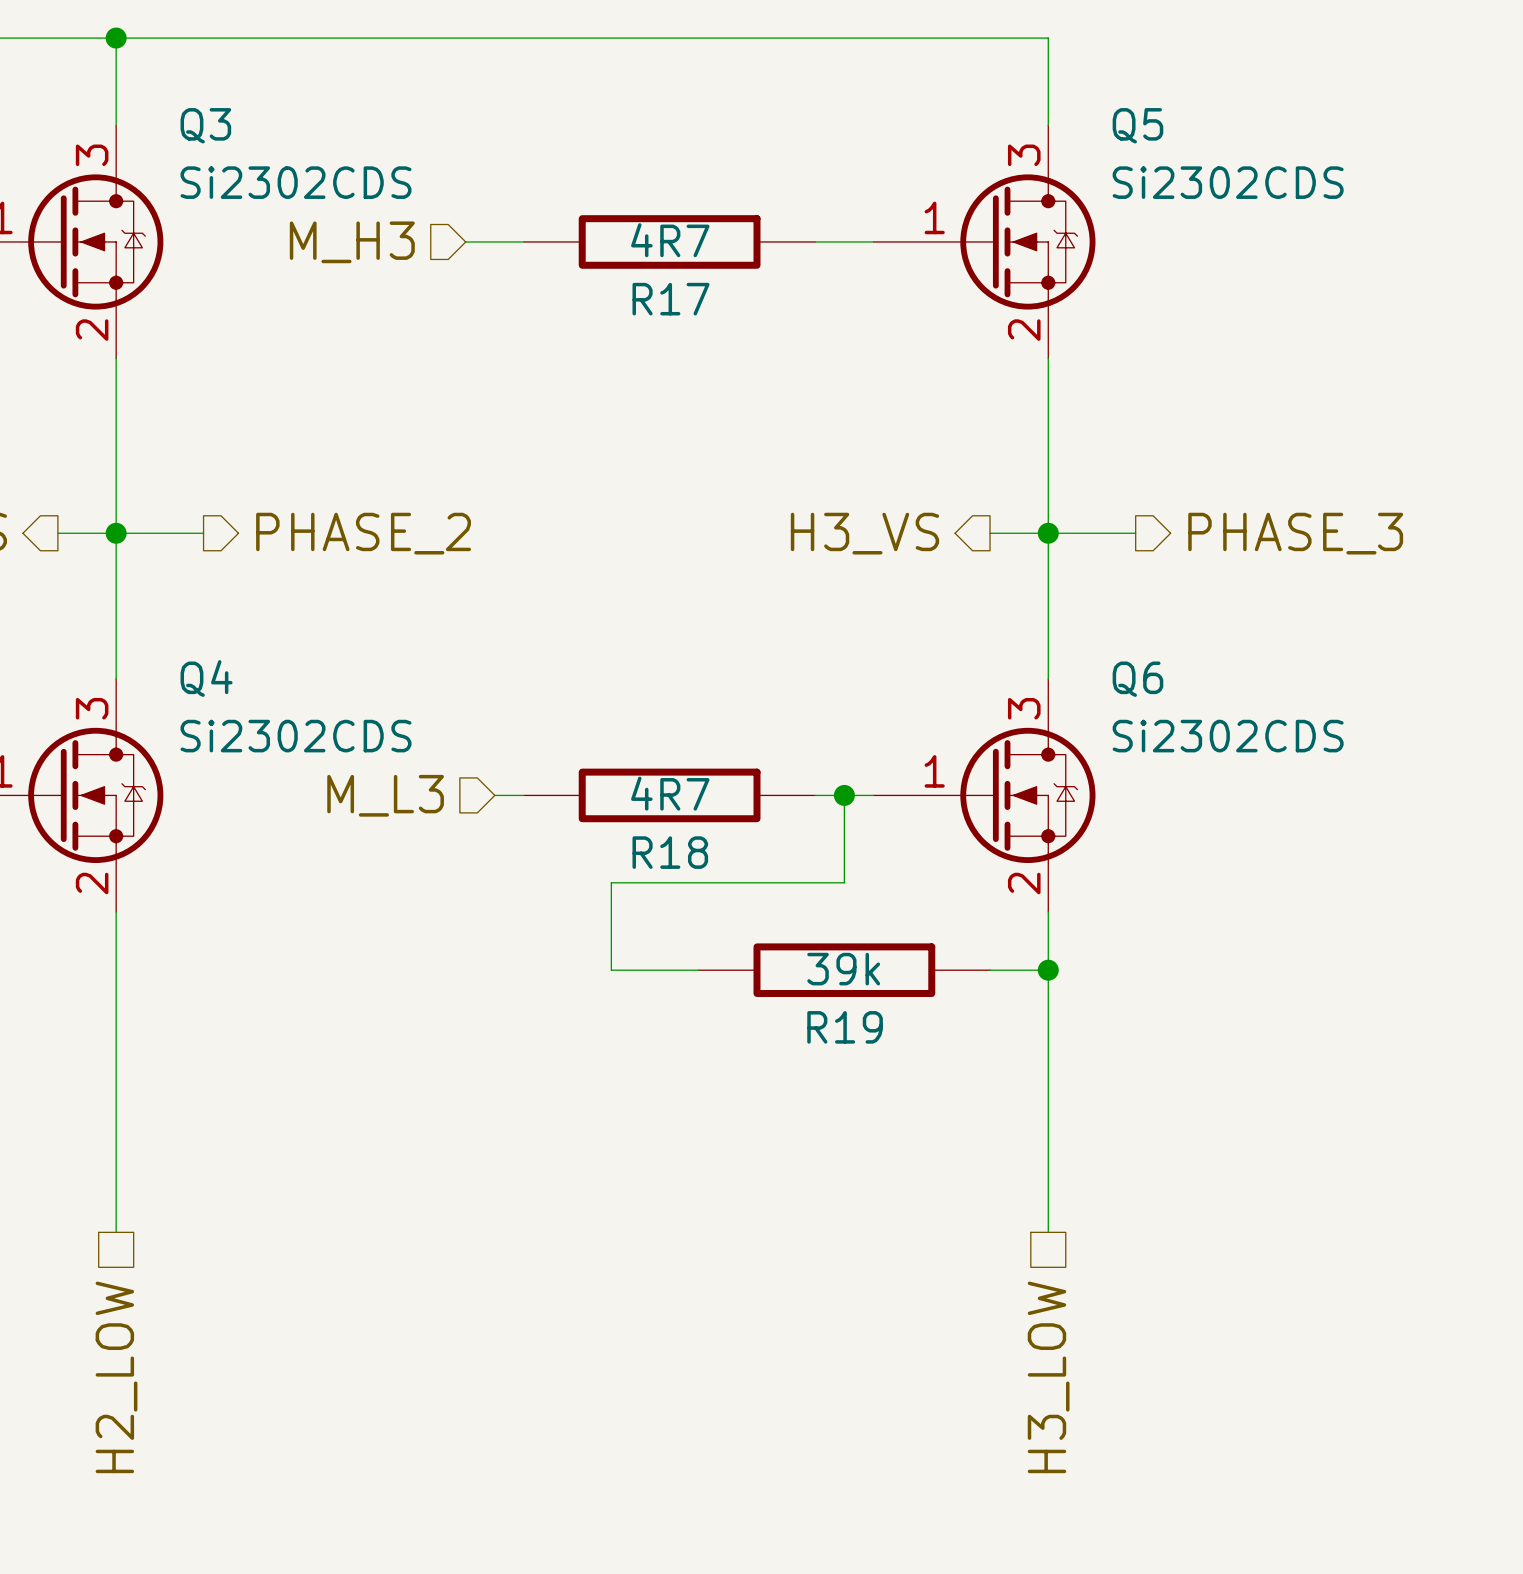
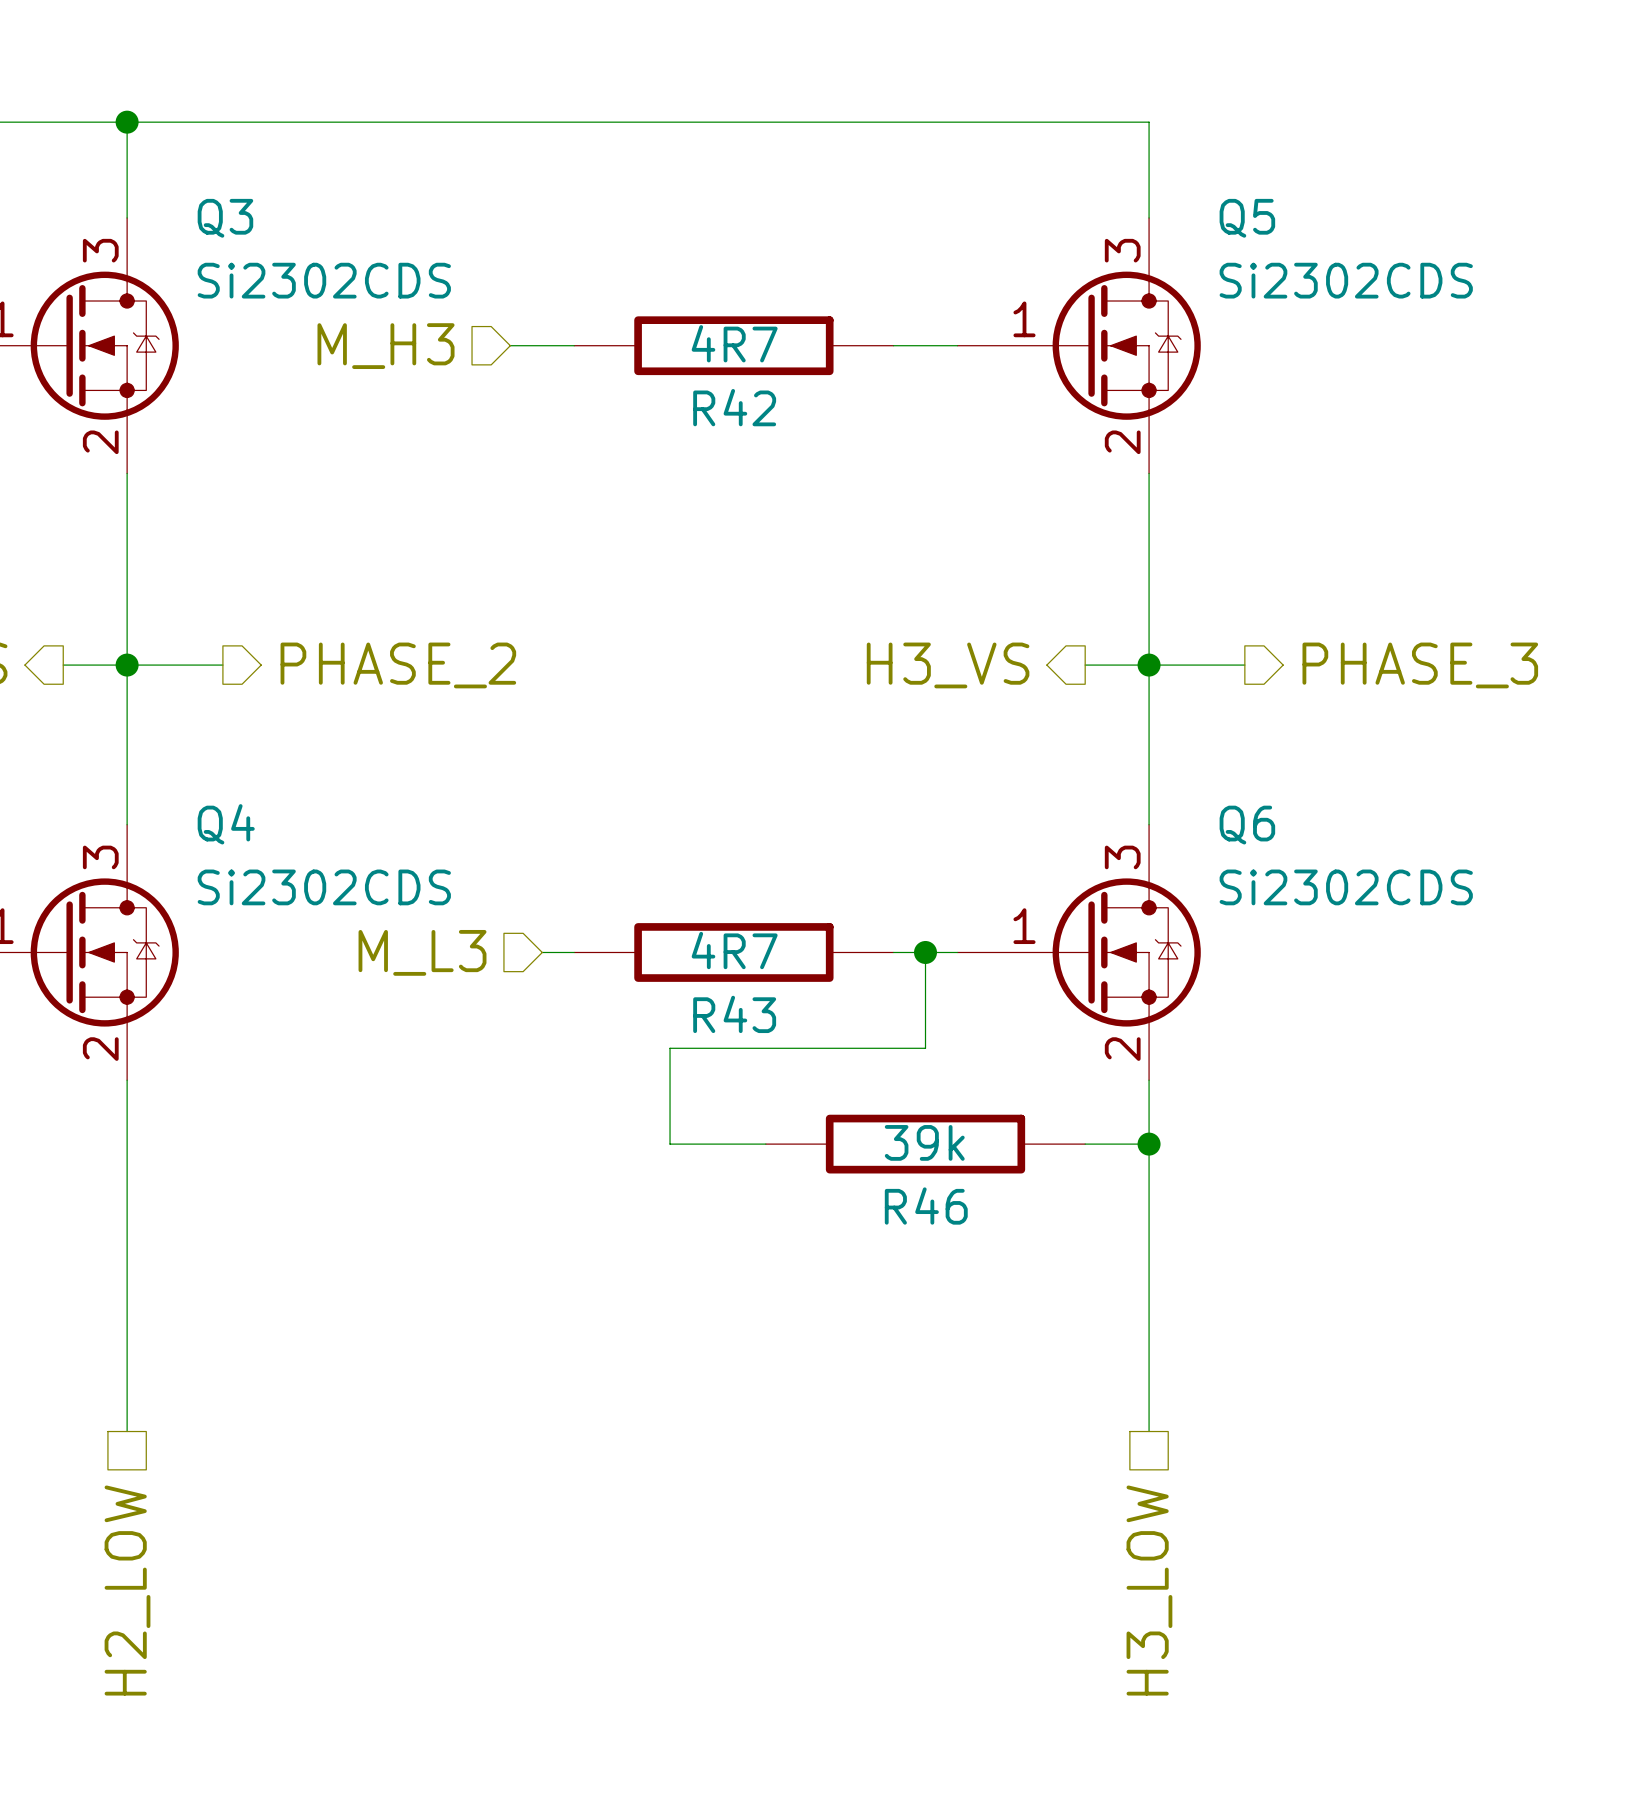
R17 name: R17 (670, 299) -> R42 (734, 407)
R18 name: R18 (670, 852) -> R43 (734, 1014)
R19 name: R19 (845, 1027) -> R46 (926, 1206)

